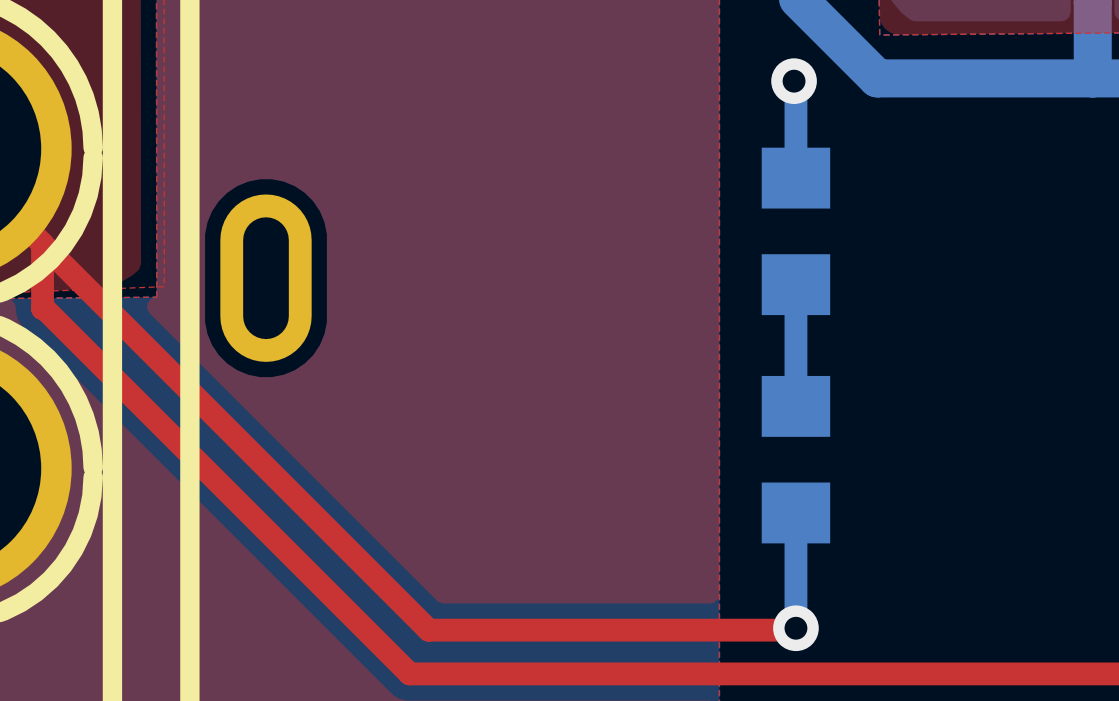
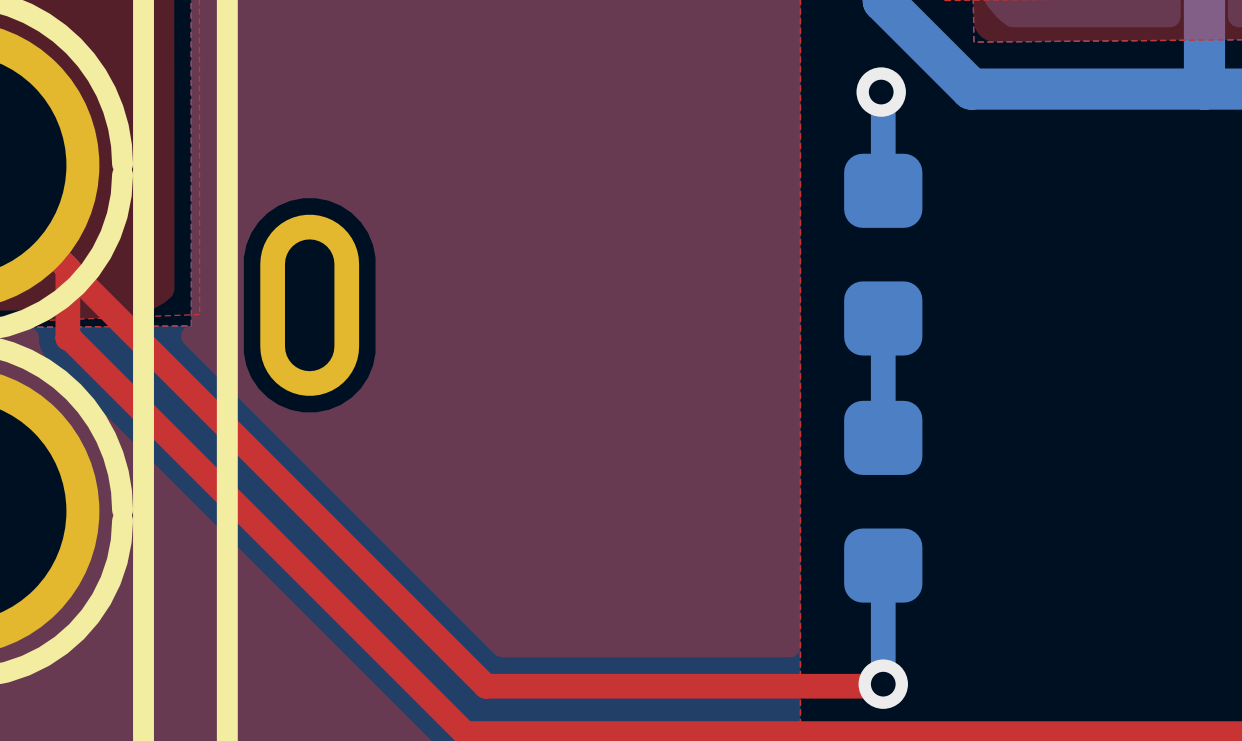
part footprint: [761, 147, 831, 316] -> [844, 153, 923, 356]
part footprint: [761, 375, 831, 544] -> [844, 400, 923, 603]

